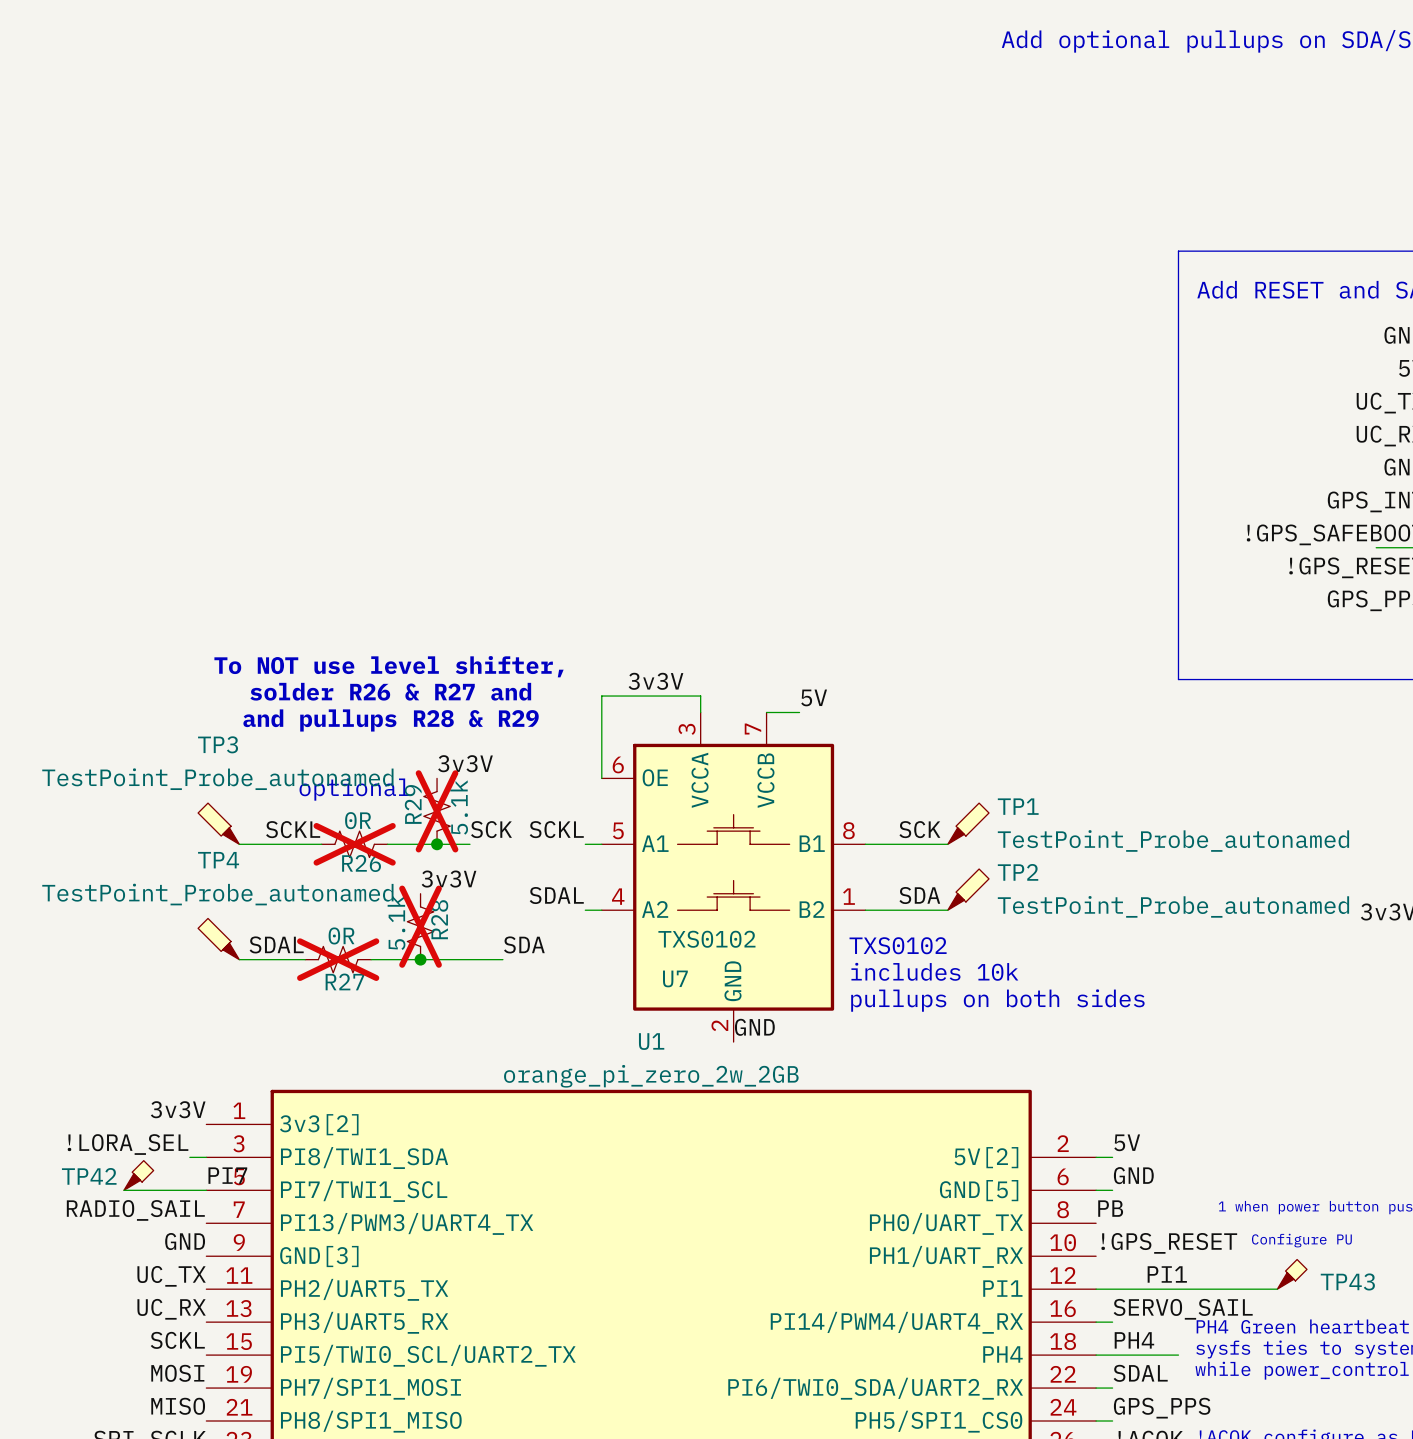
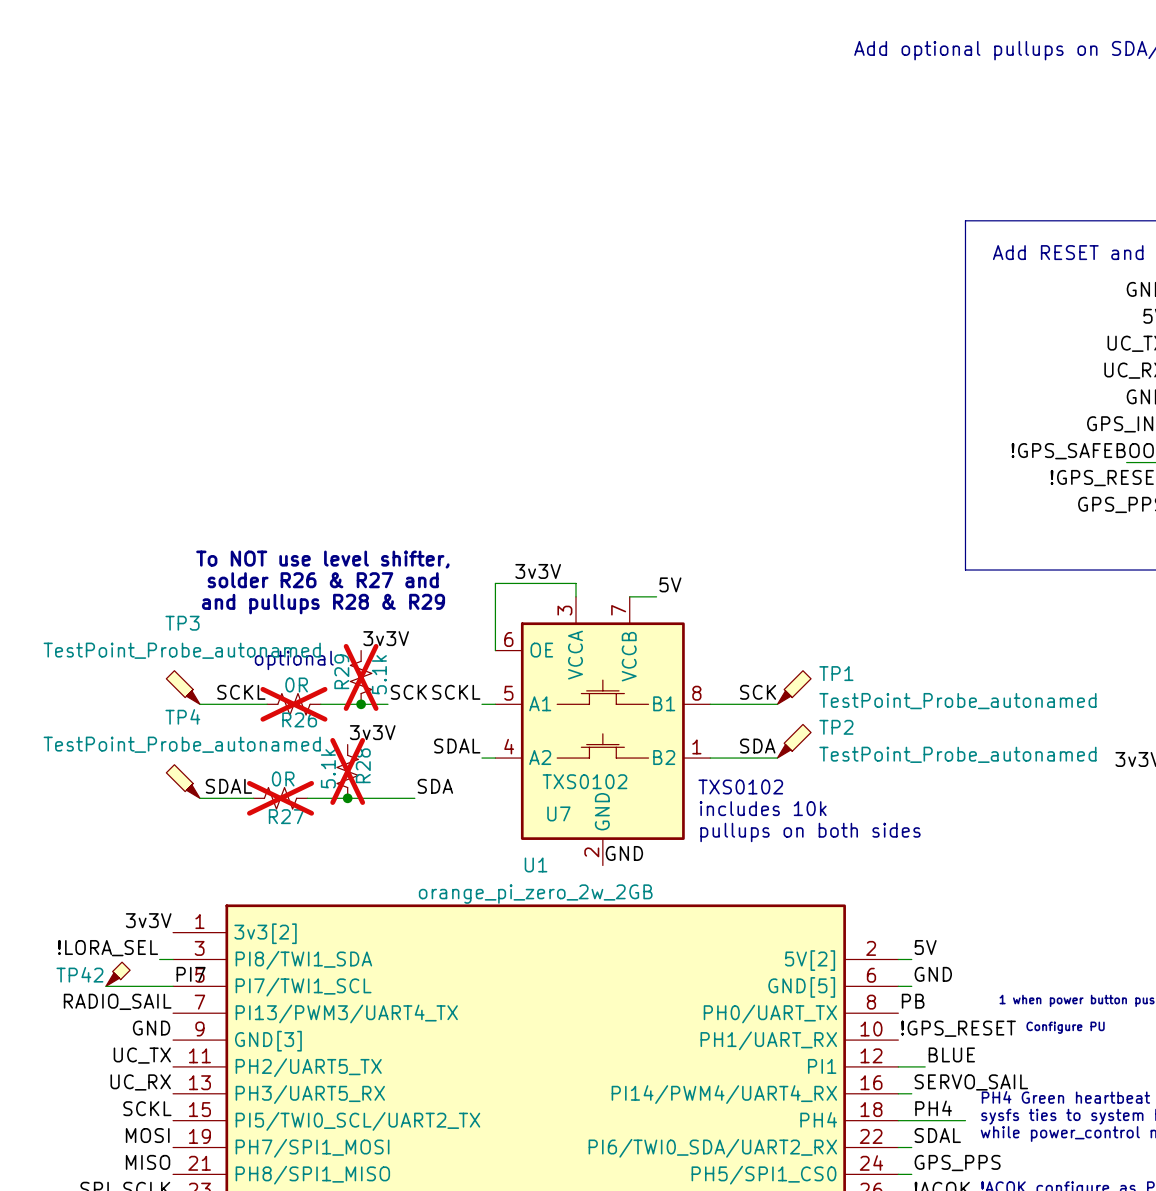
label: none -> BLUE (951, 1054)
label: PI1 (1167, 1274) -> none
TP43: (1292, 1274) -> none
wire: (1129, 1289) (1277, 1289) -> none

